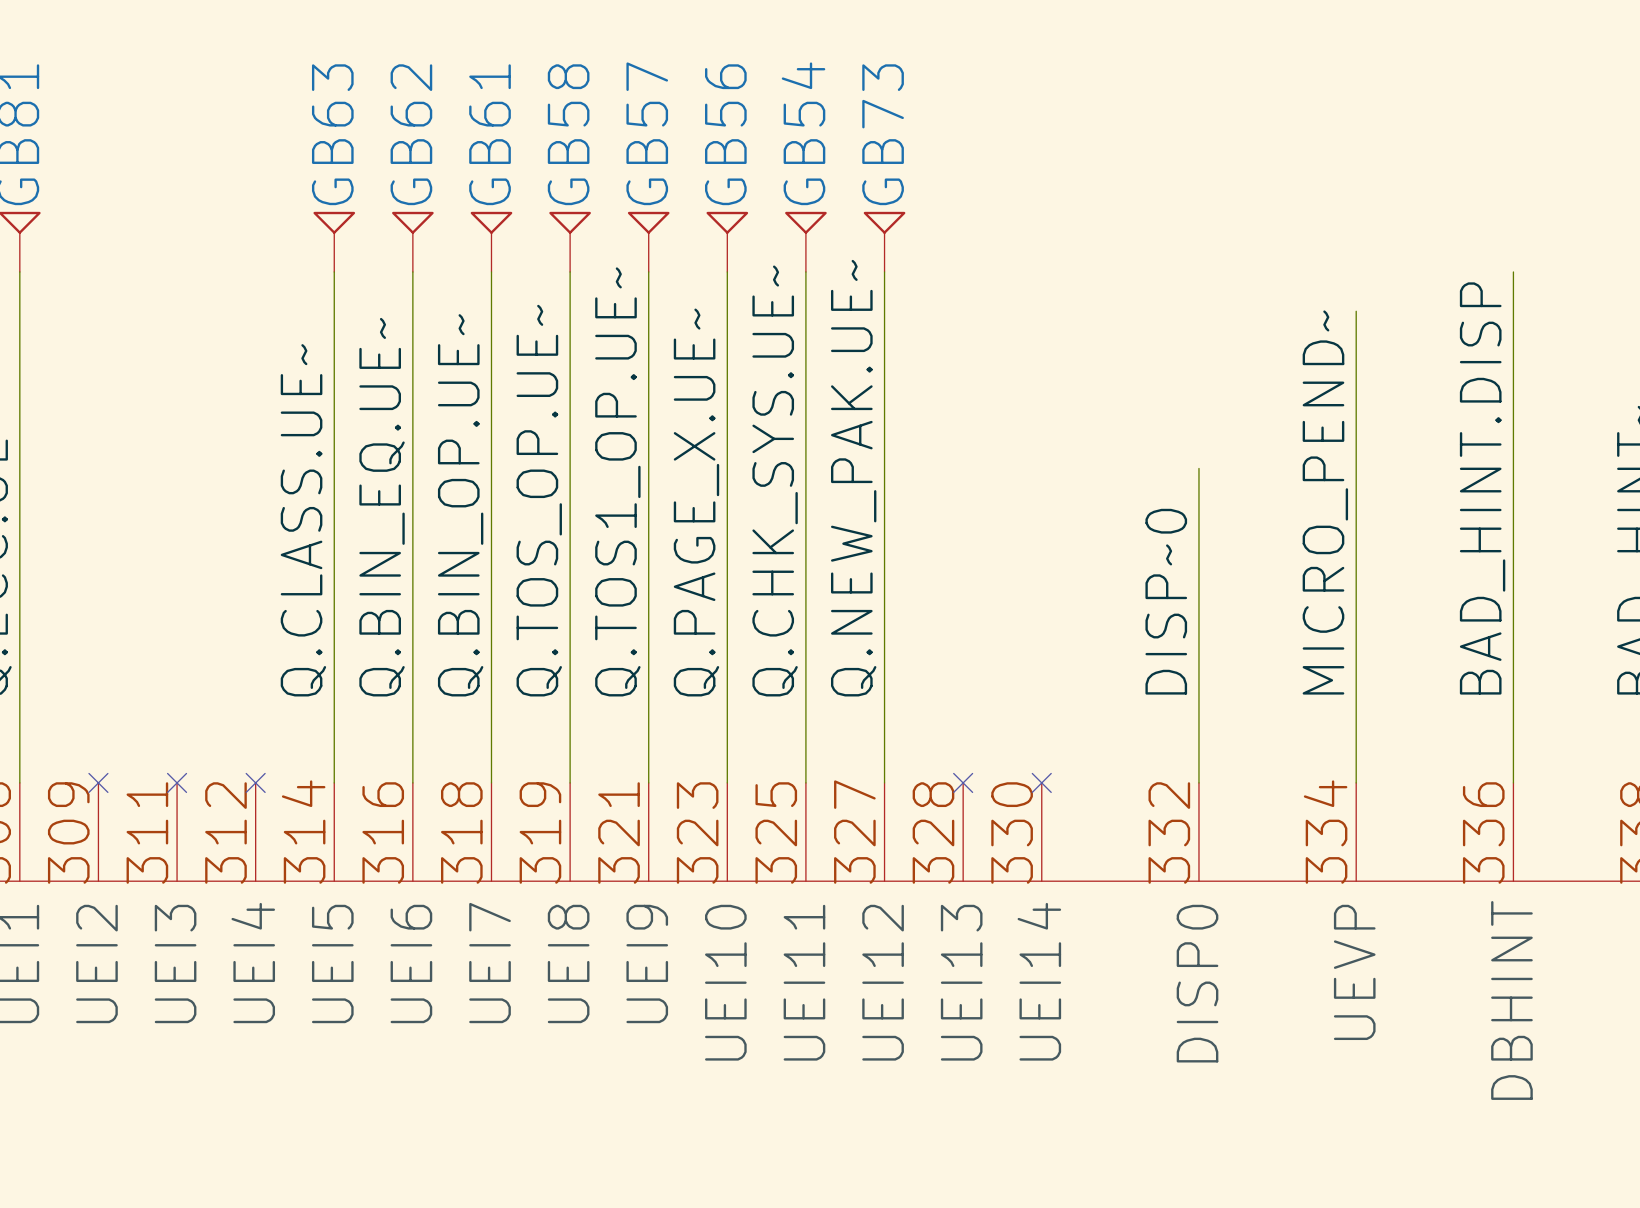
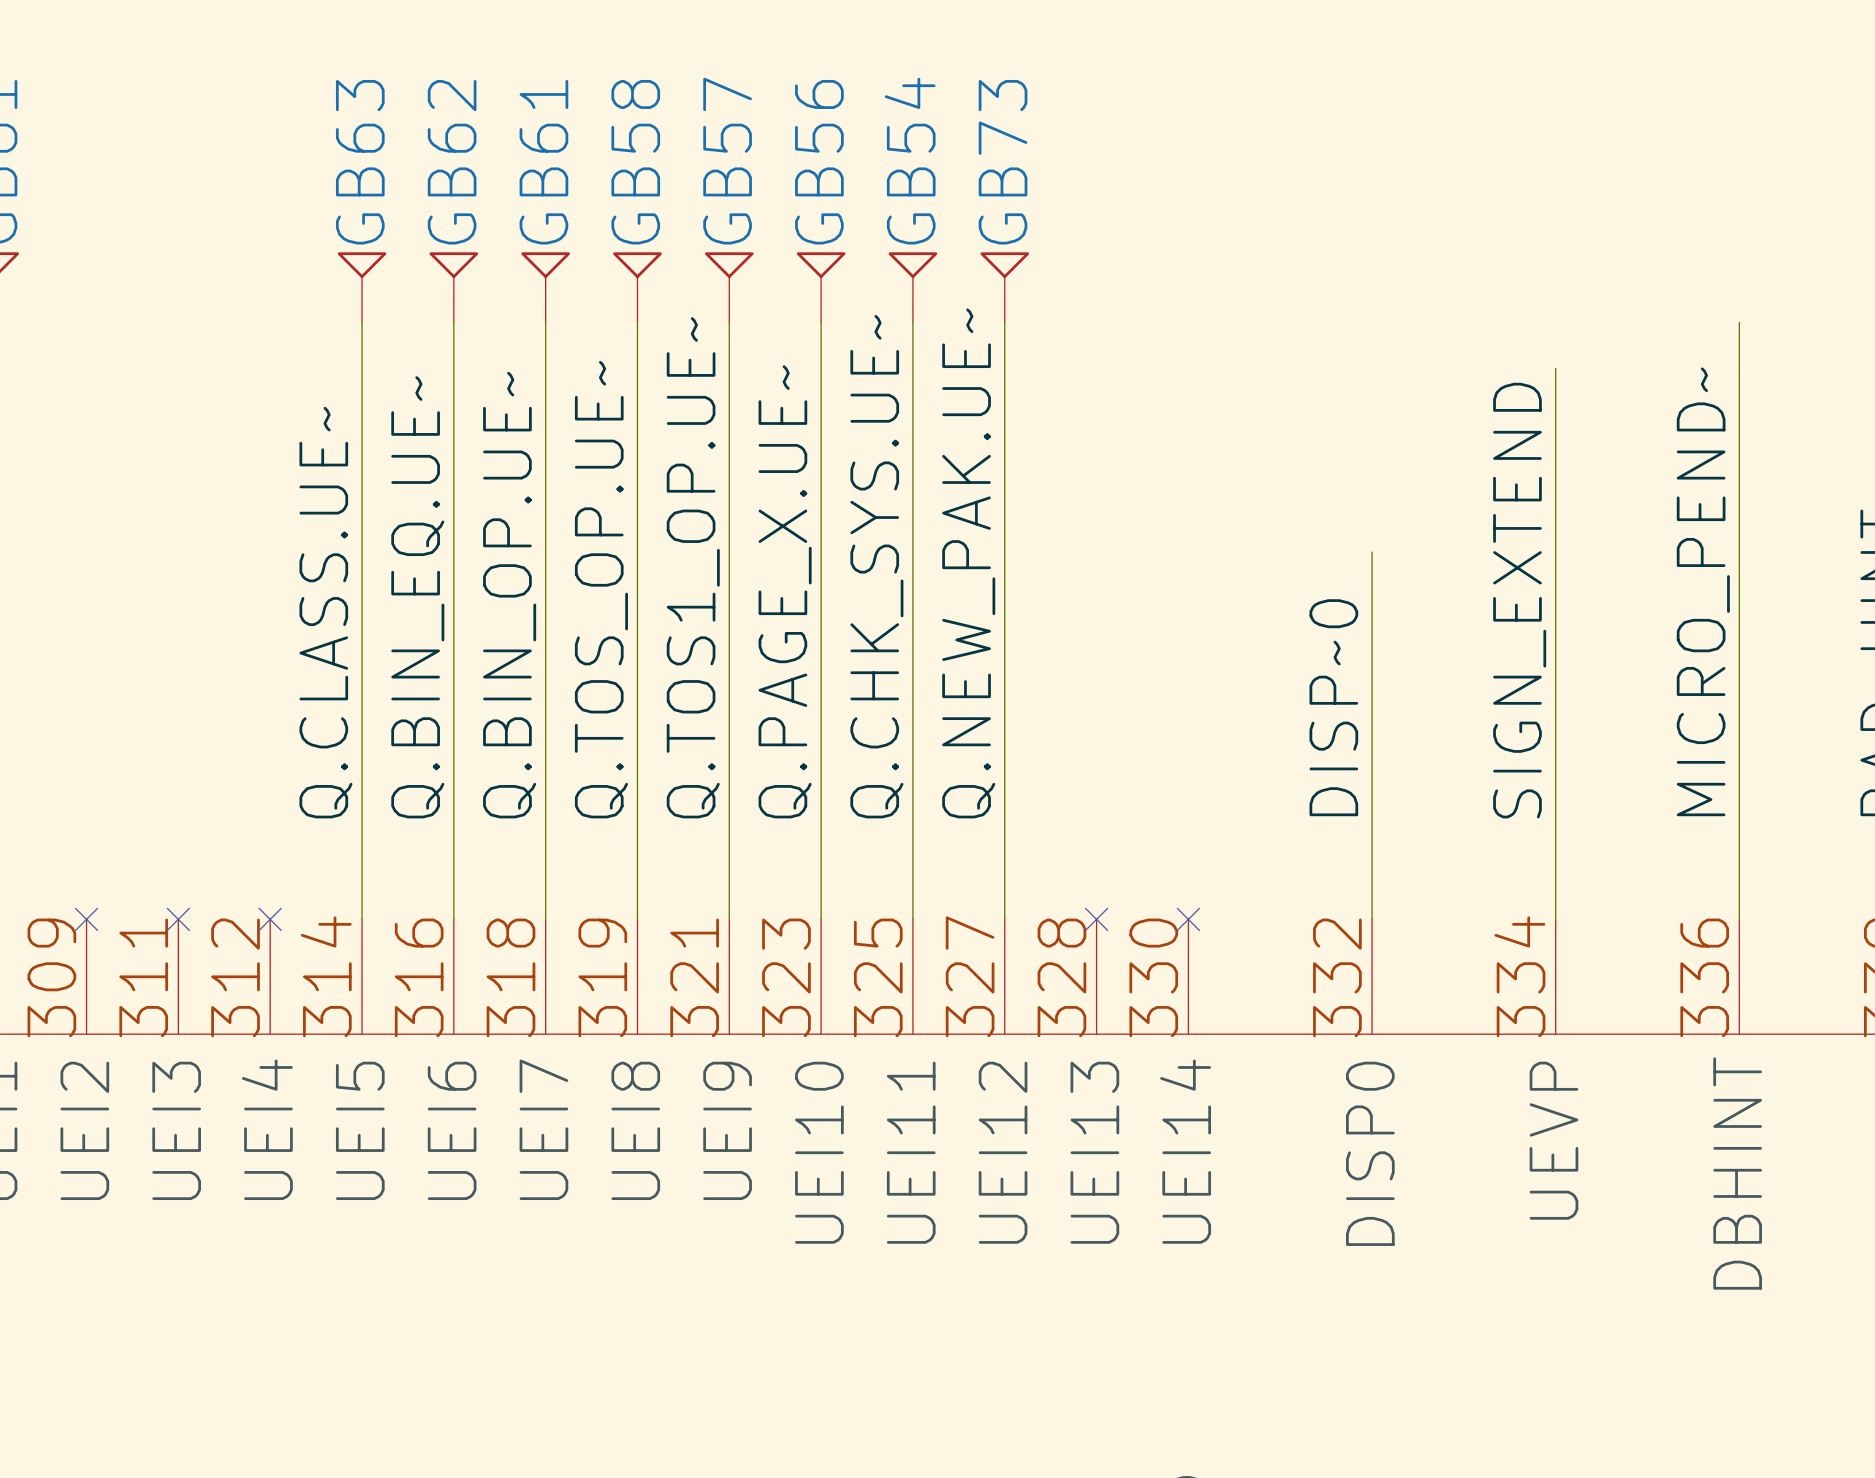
label: BAD_HINT.DISP (1482, 488) -> MICRO_PEND~ (1703, 591)
label: MICRO_PEND~ (1325, 502) -> SIGN_EXTEND (1519, 600)

